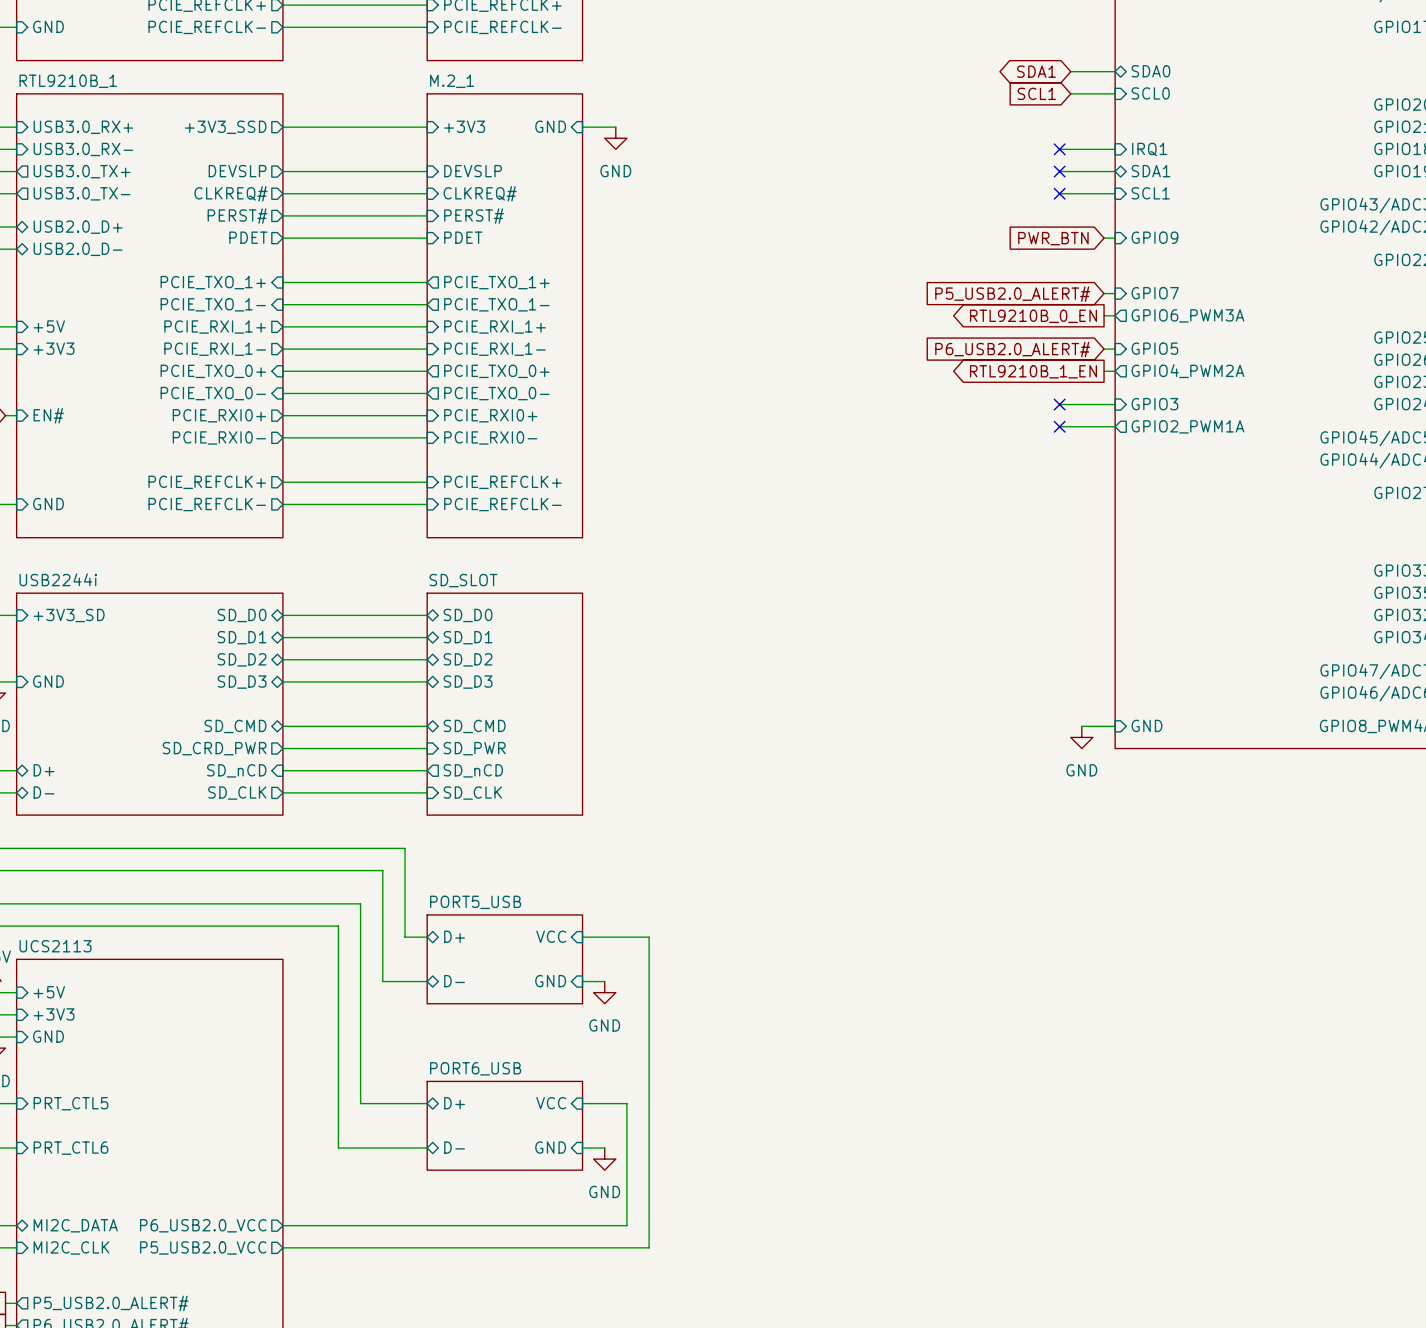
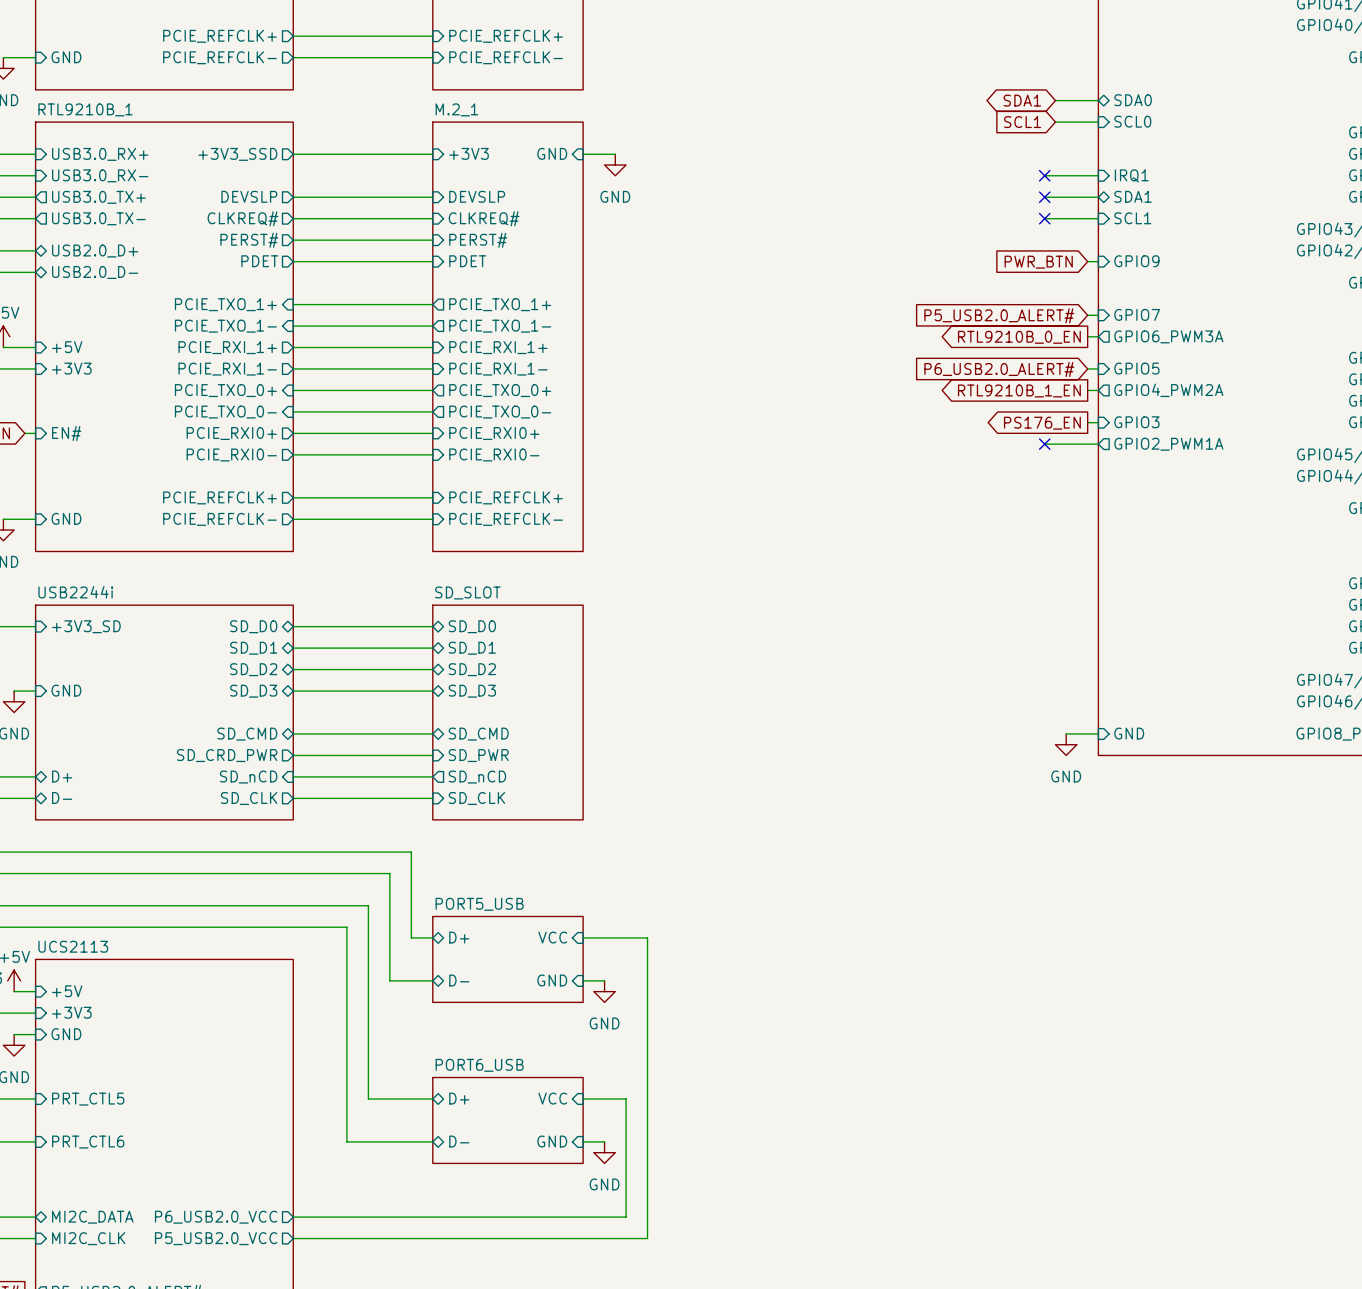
wire: (1059, 404) (1104, 404) -> none
no-connect mark: (1059, 404) -> none
global label: none -> PS176_EN (1042, 423)

